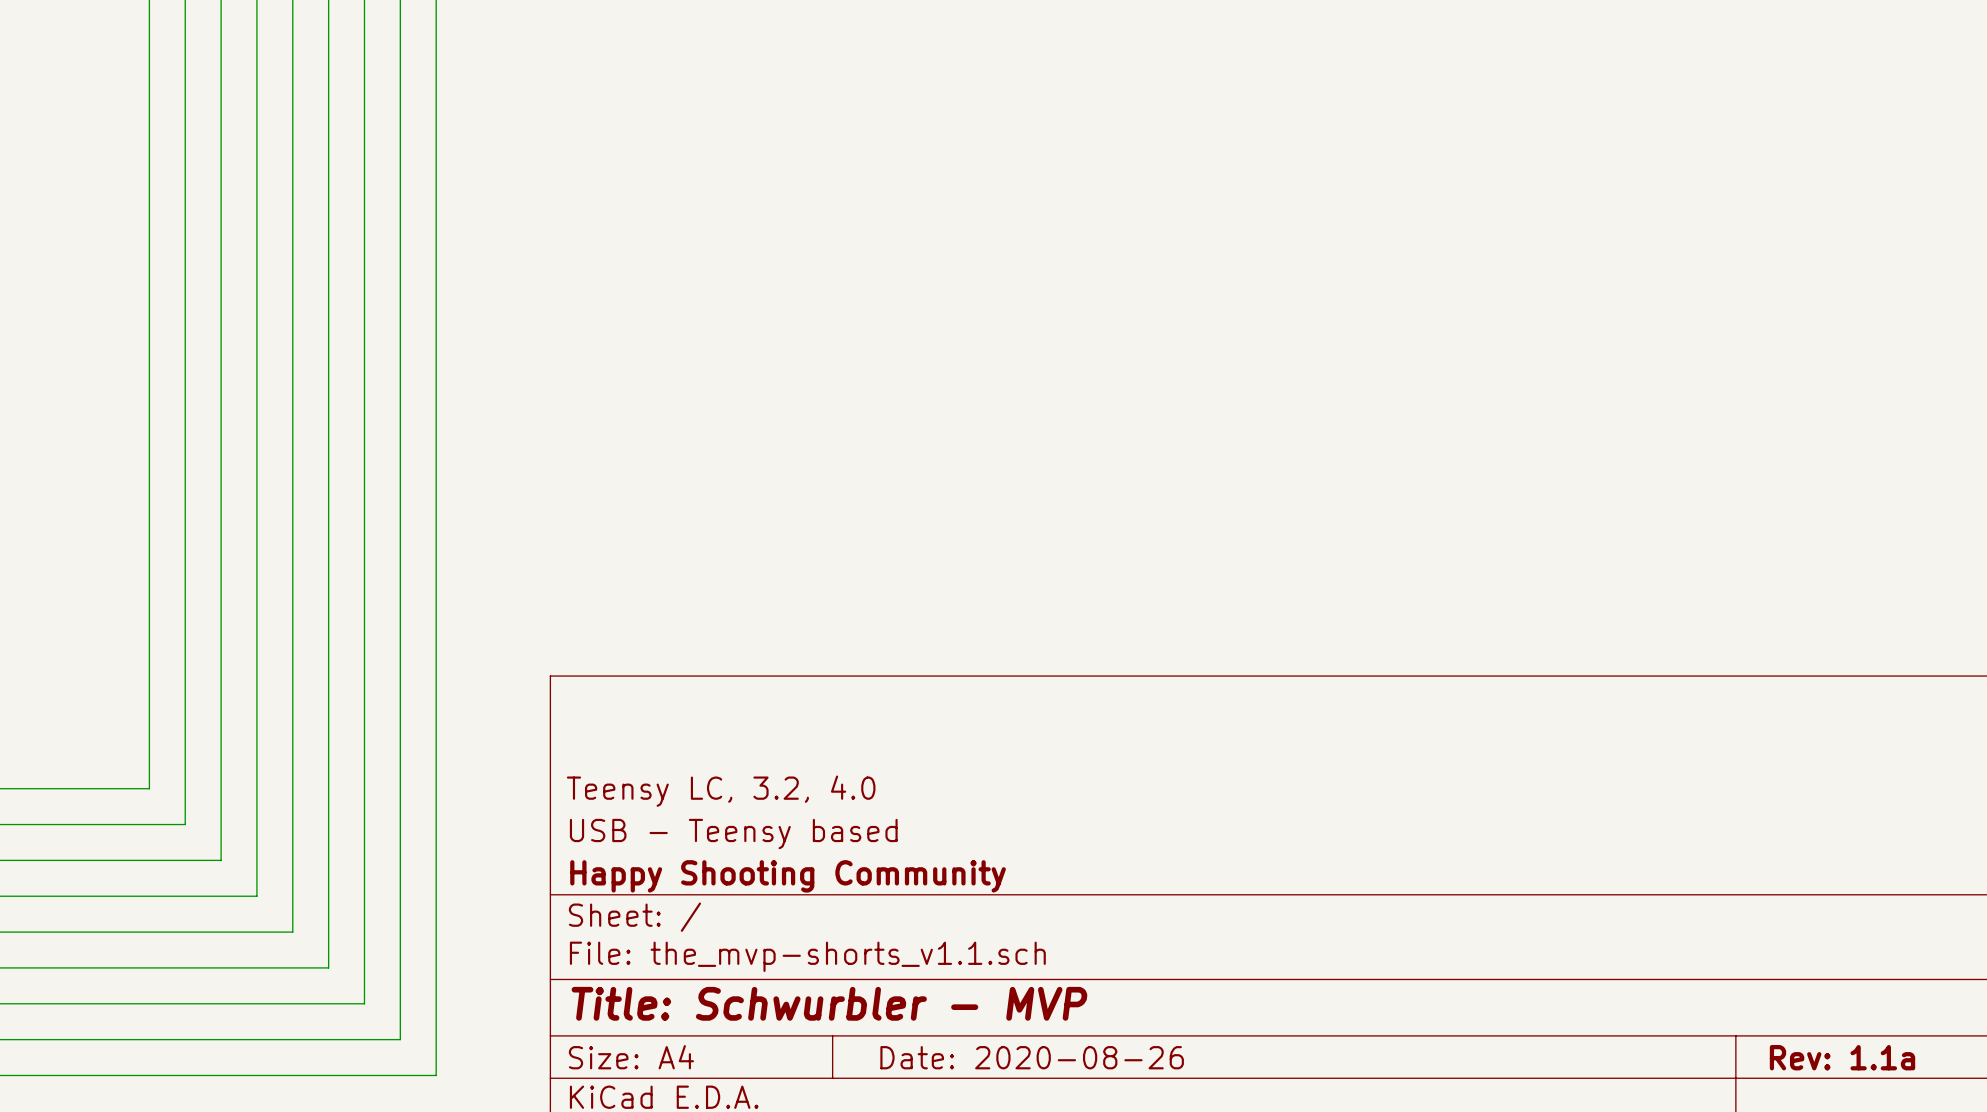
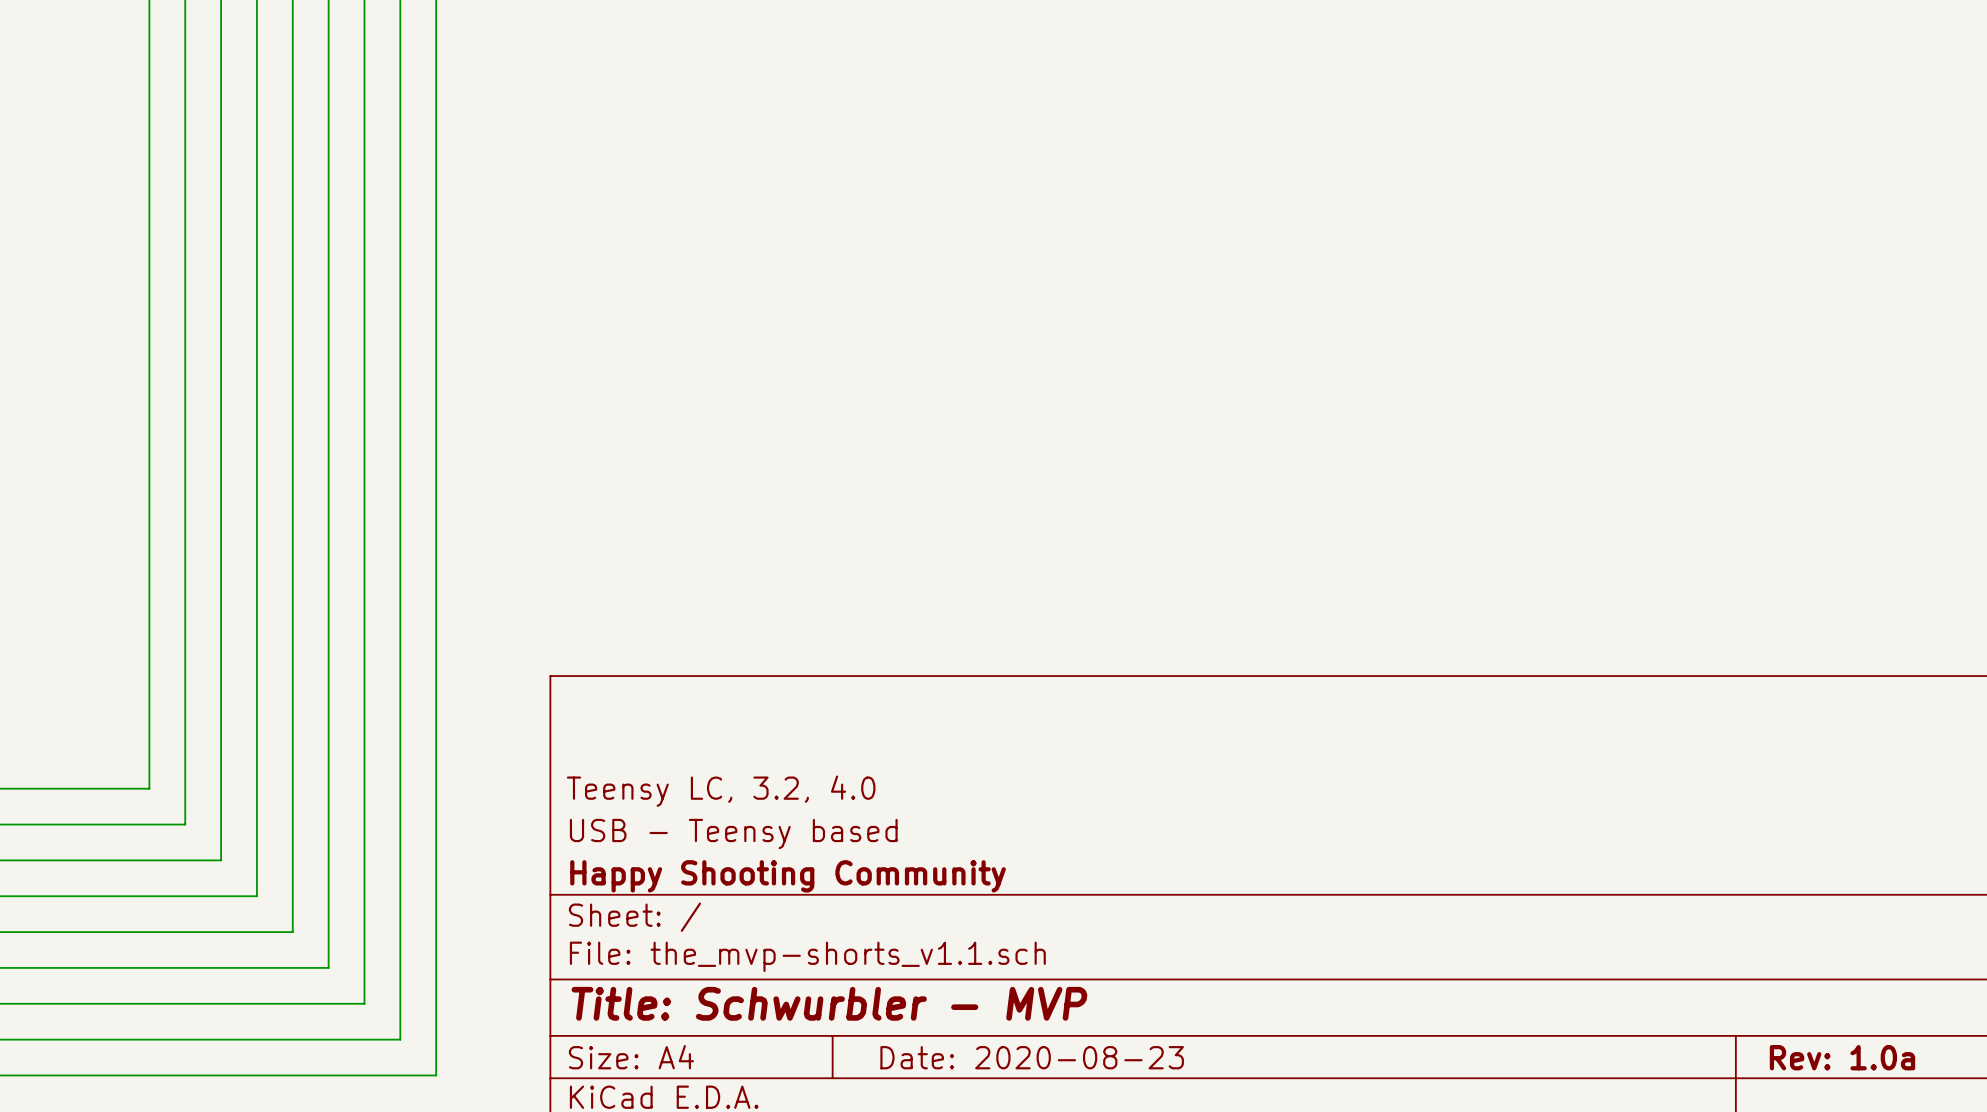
title block: Date: 2020-08-26 (1032, 1057) -> Date: 2020-08-23 (1032, 1057)
title block: Rev: 1.1a (1842, 1057) -> Rev: 1.0a (1842, 1057)

